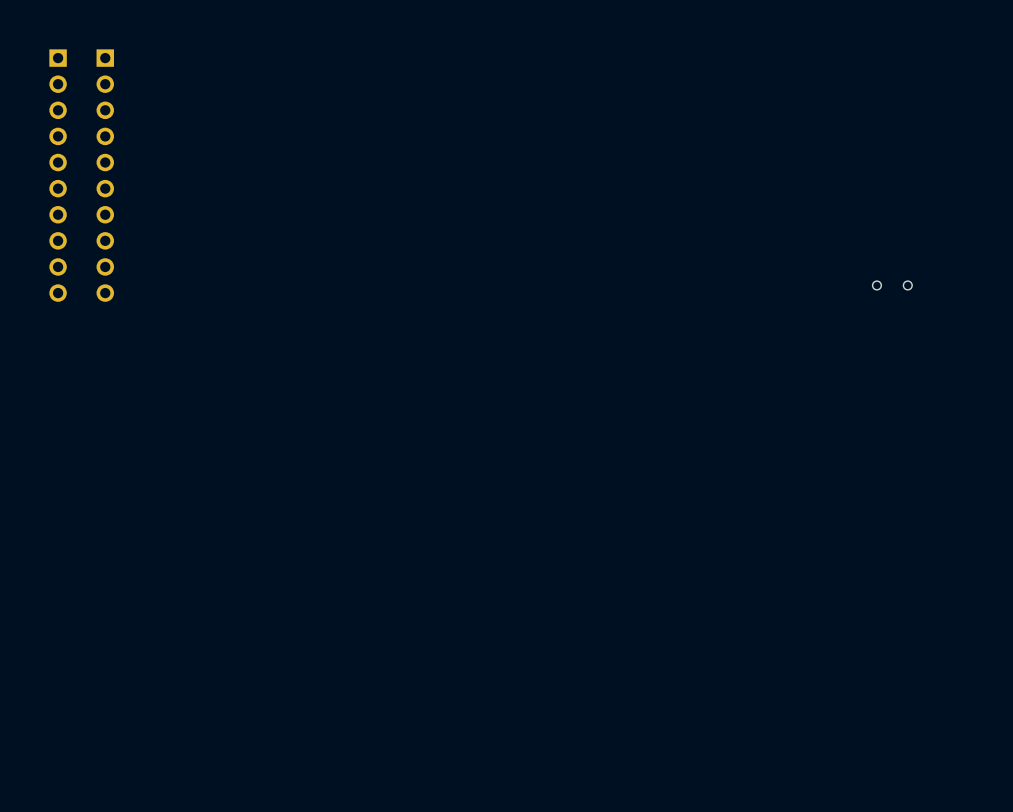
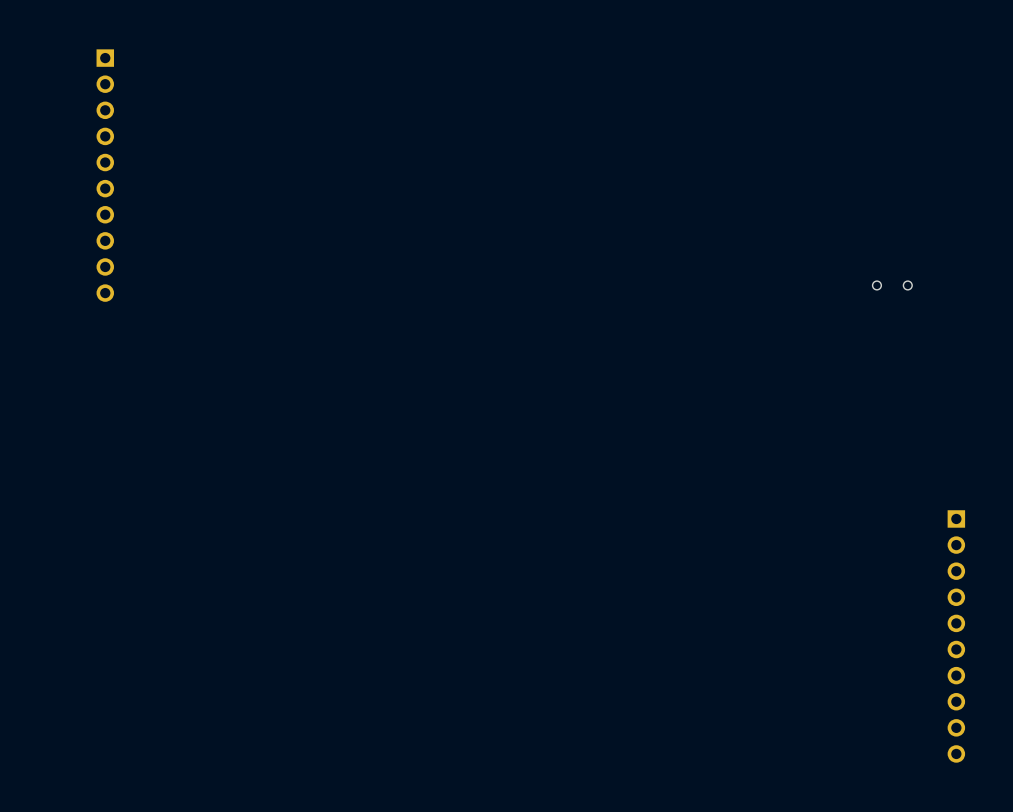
part: (58, 175) -> none
part: none -> (956, 636)

